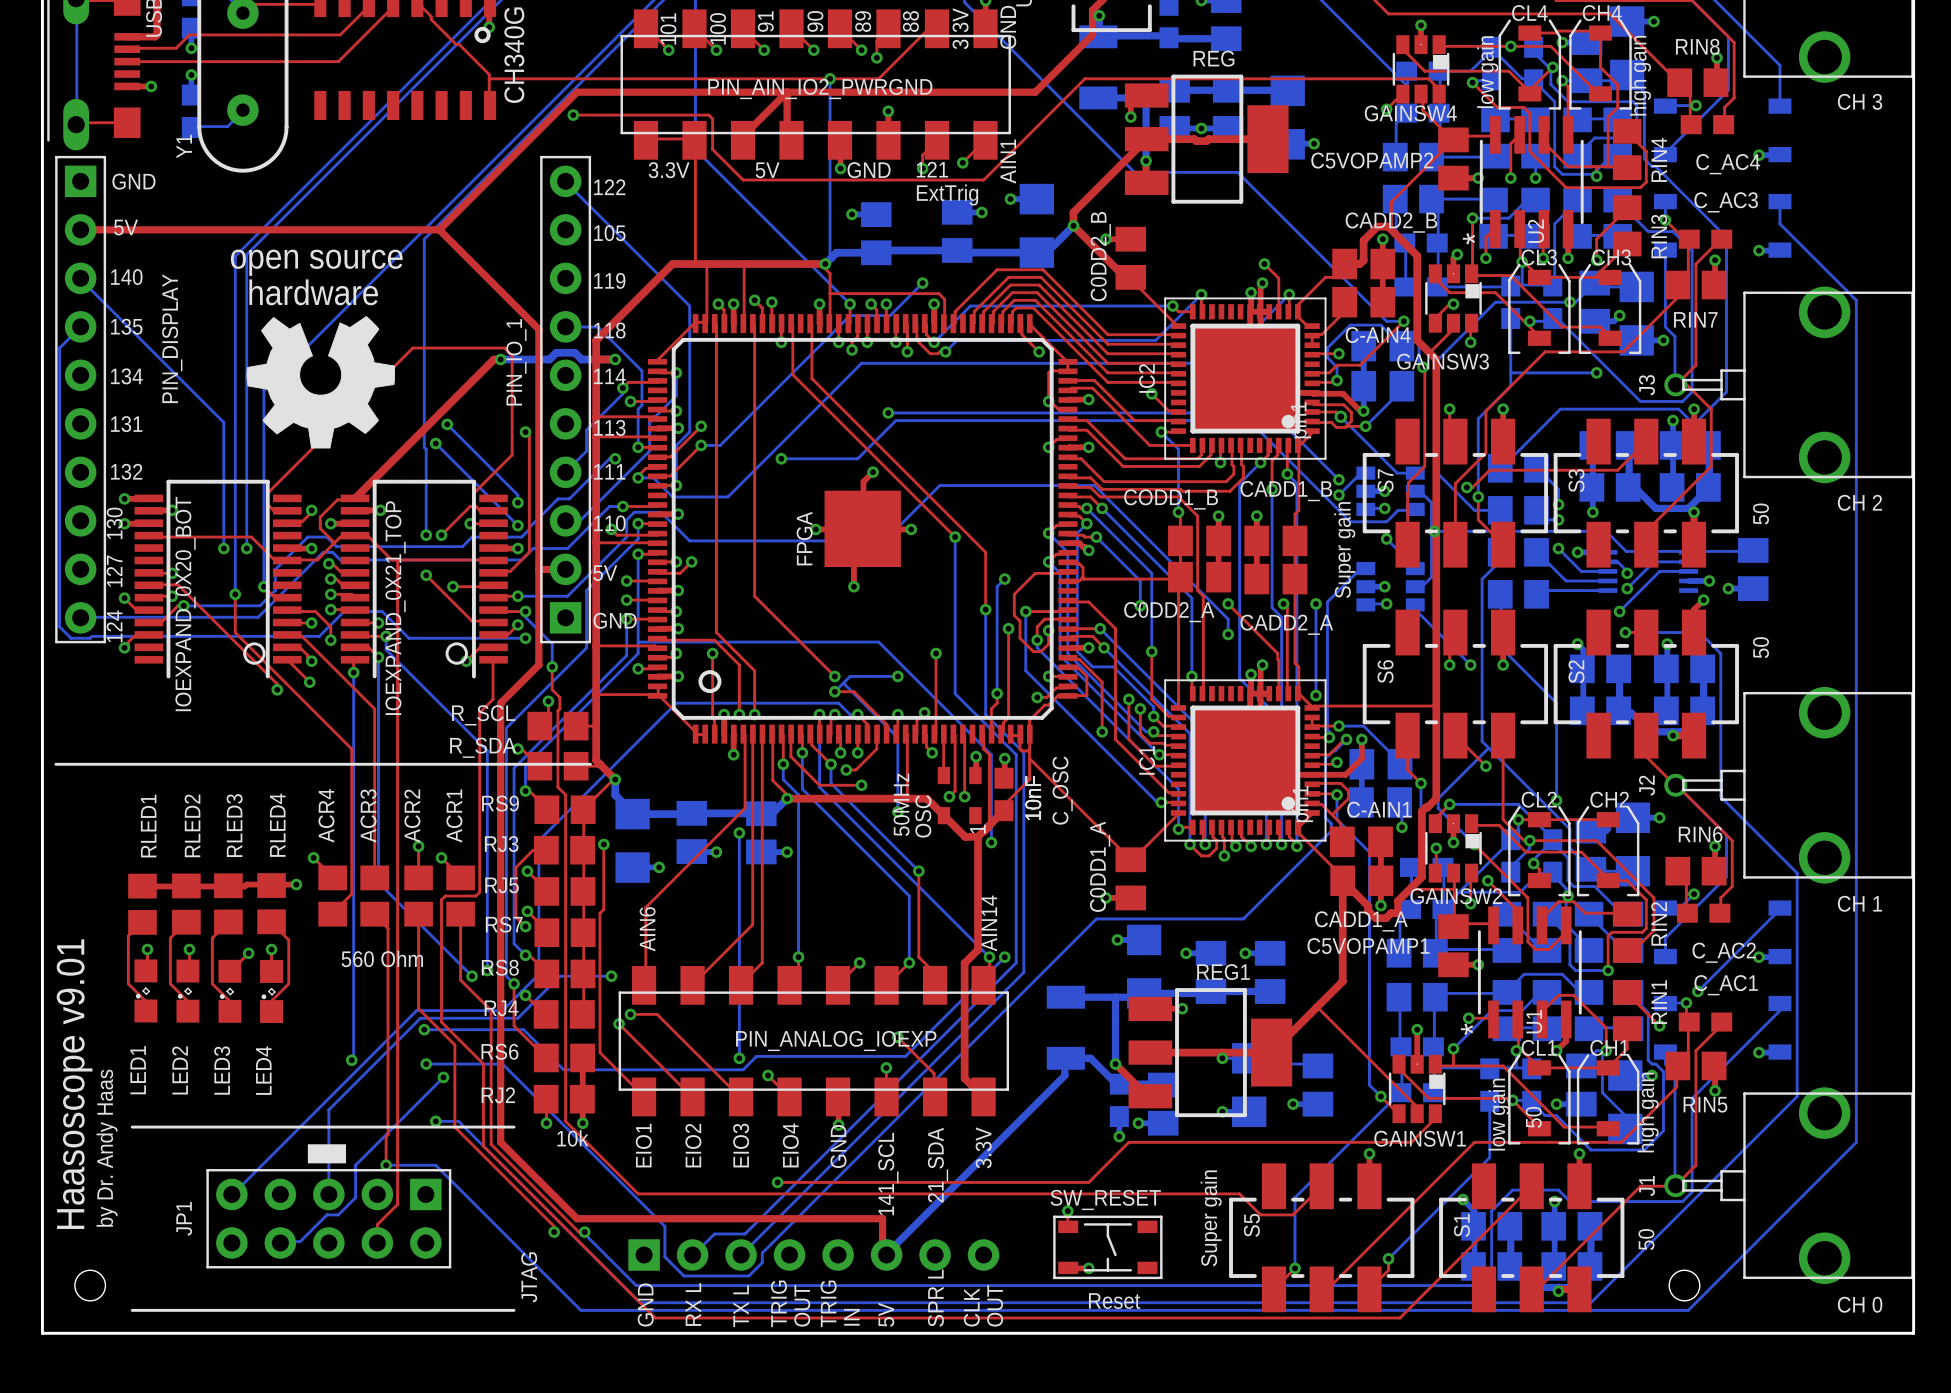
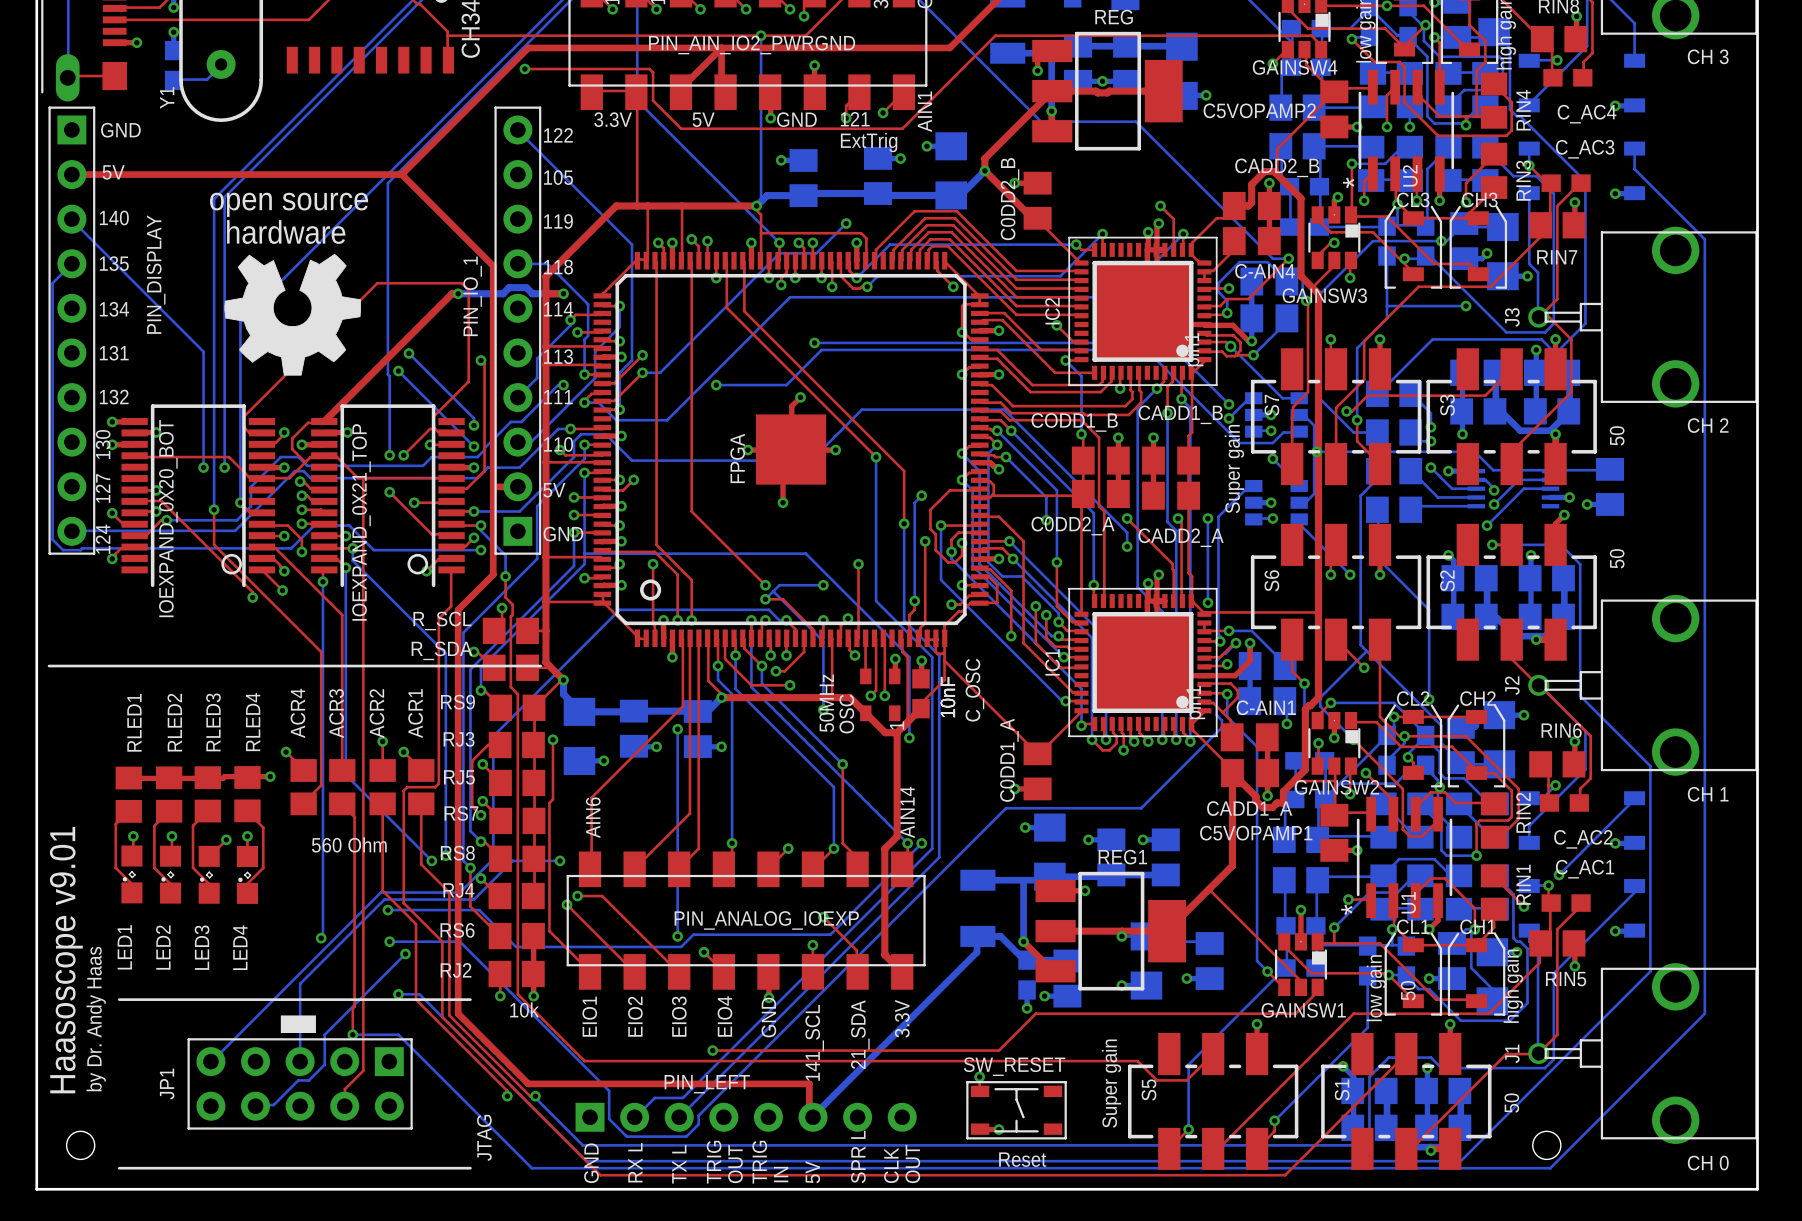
PIN_LEFT name: none -> PIN_LEFT (707, 1084)

